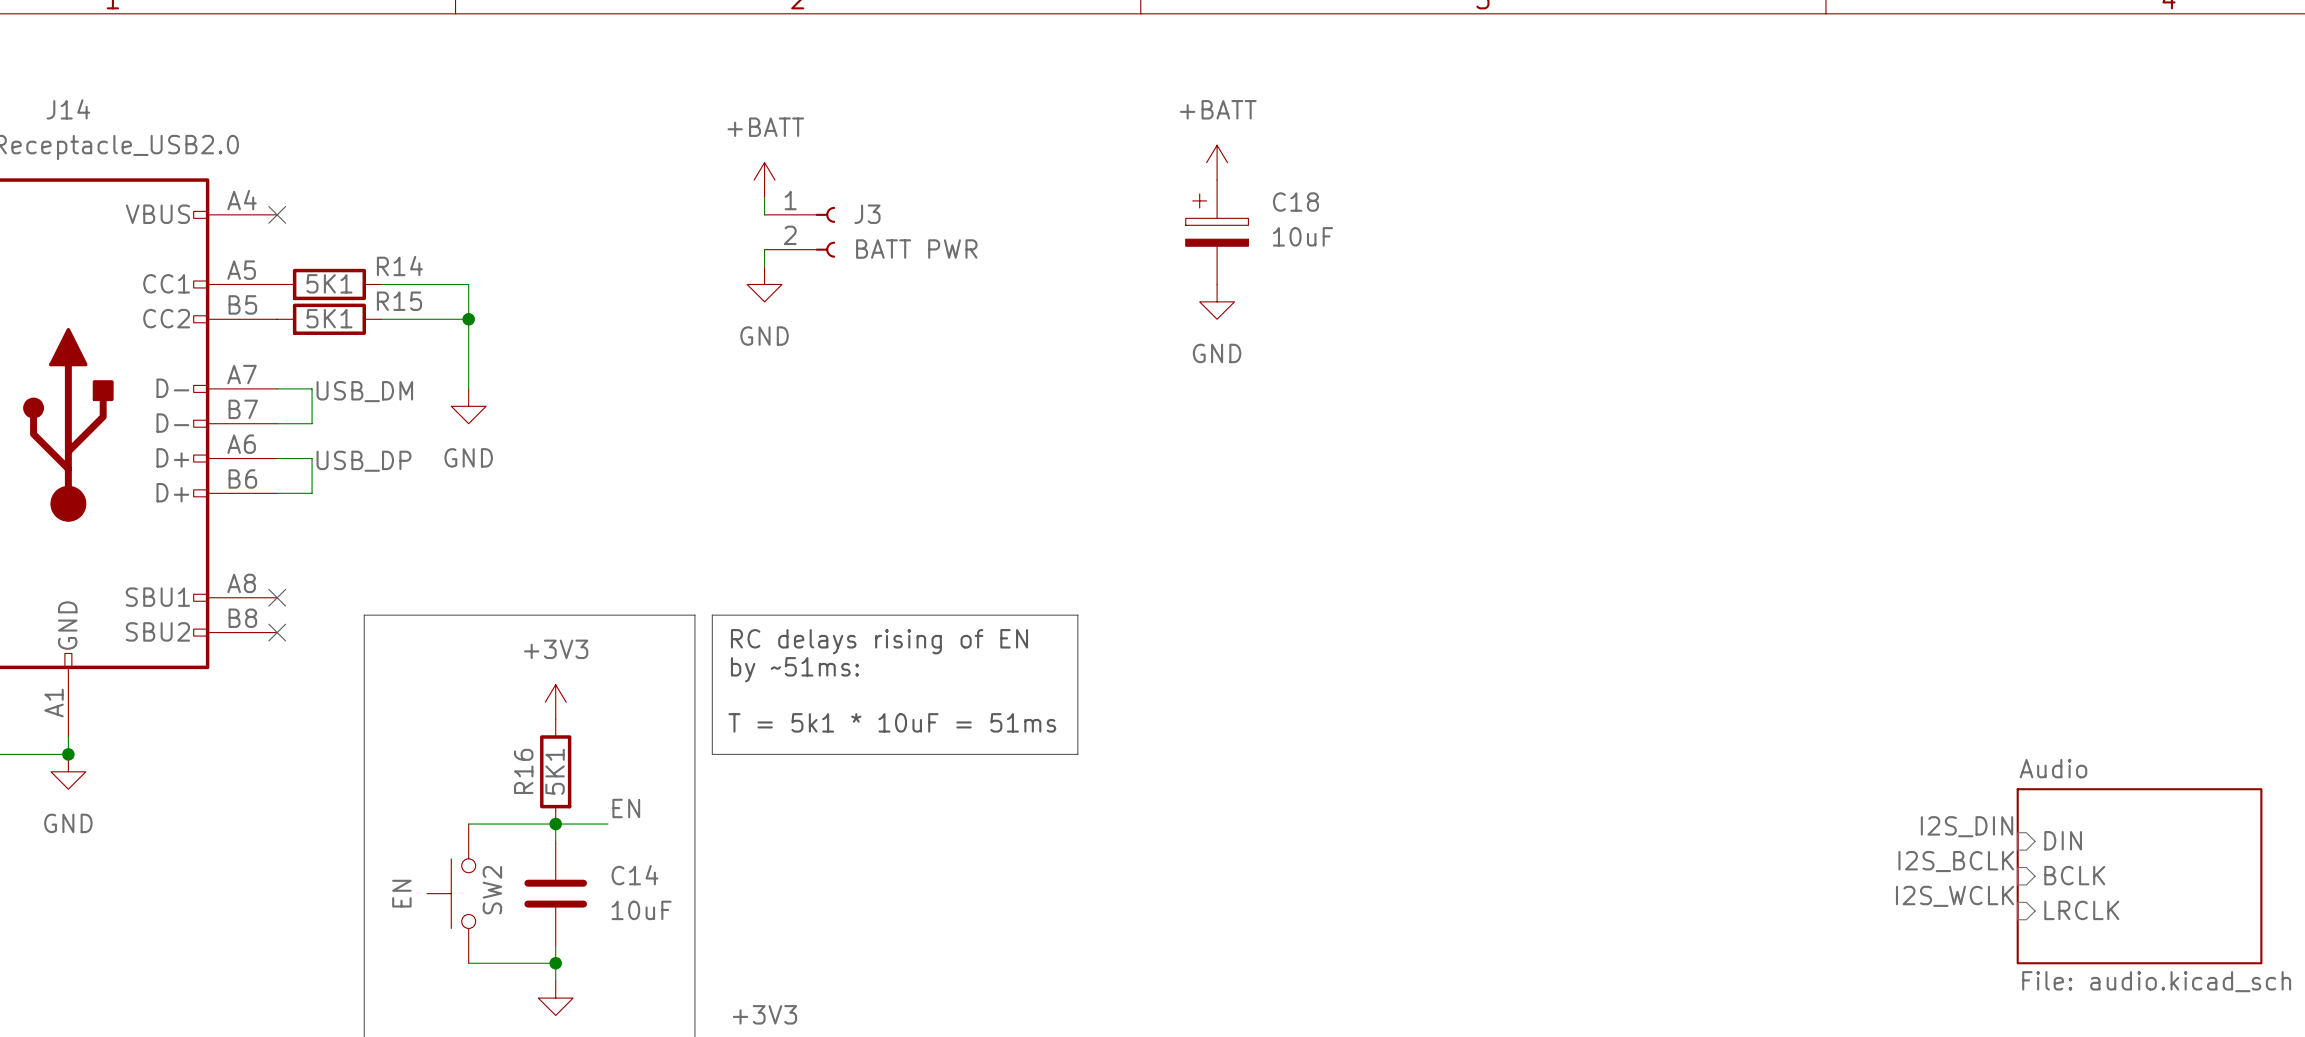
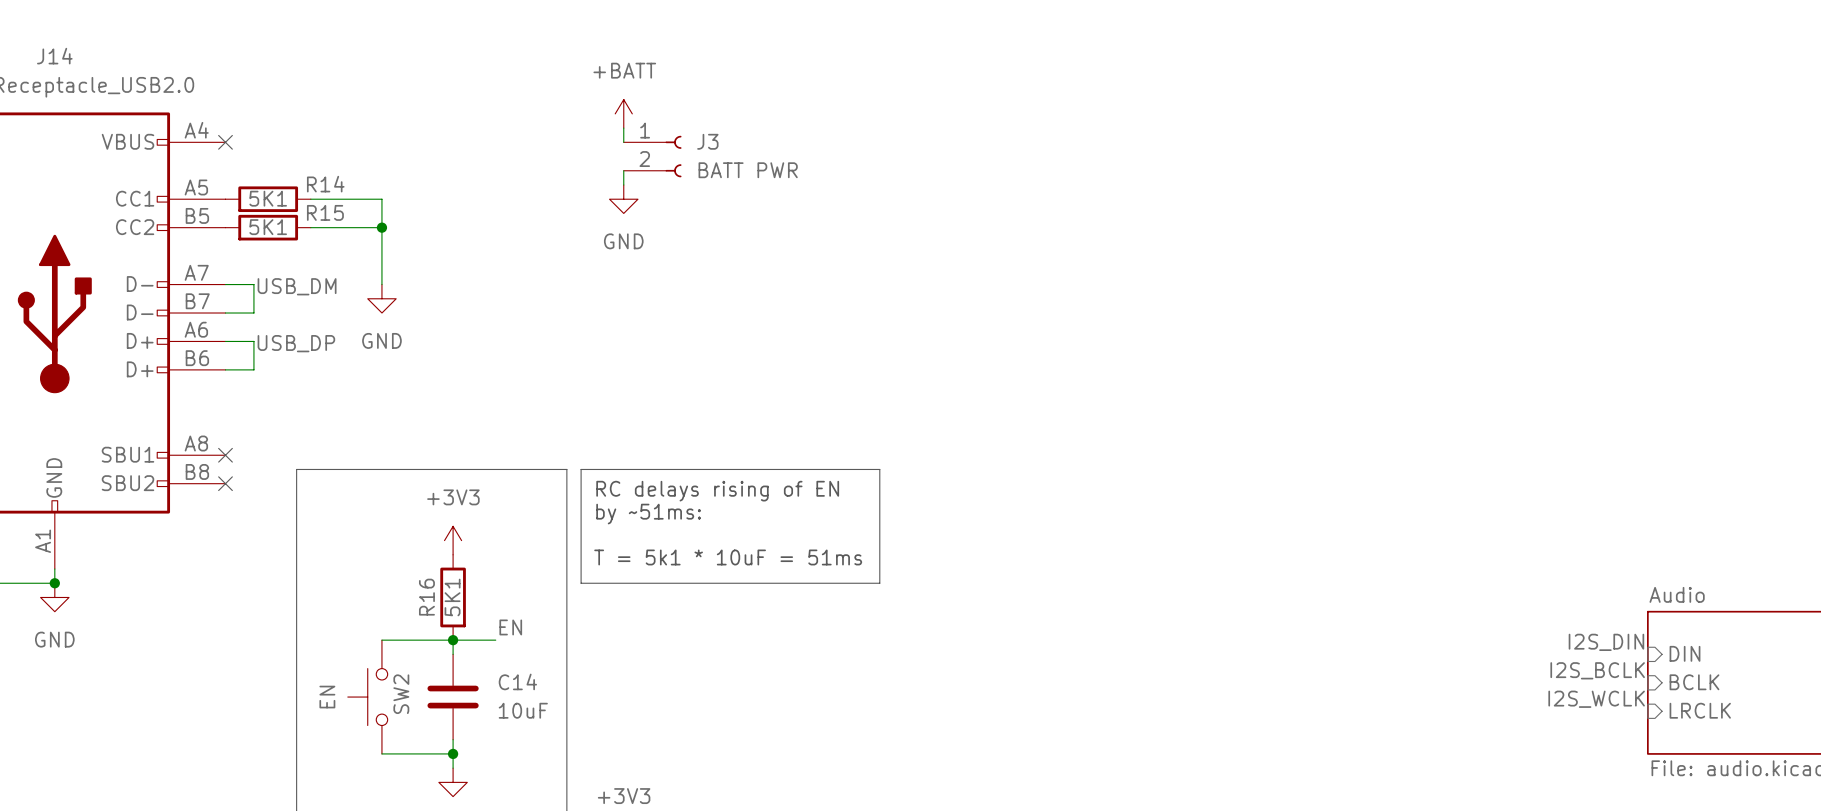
power symbol: +BATT (1217, 162) -> none
C18: 10uF (1217, 232) -> none
power symbol: GND (1217, 301) -> none

